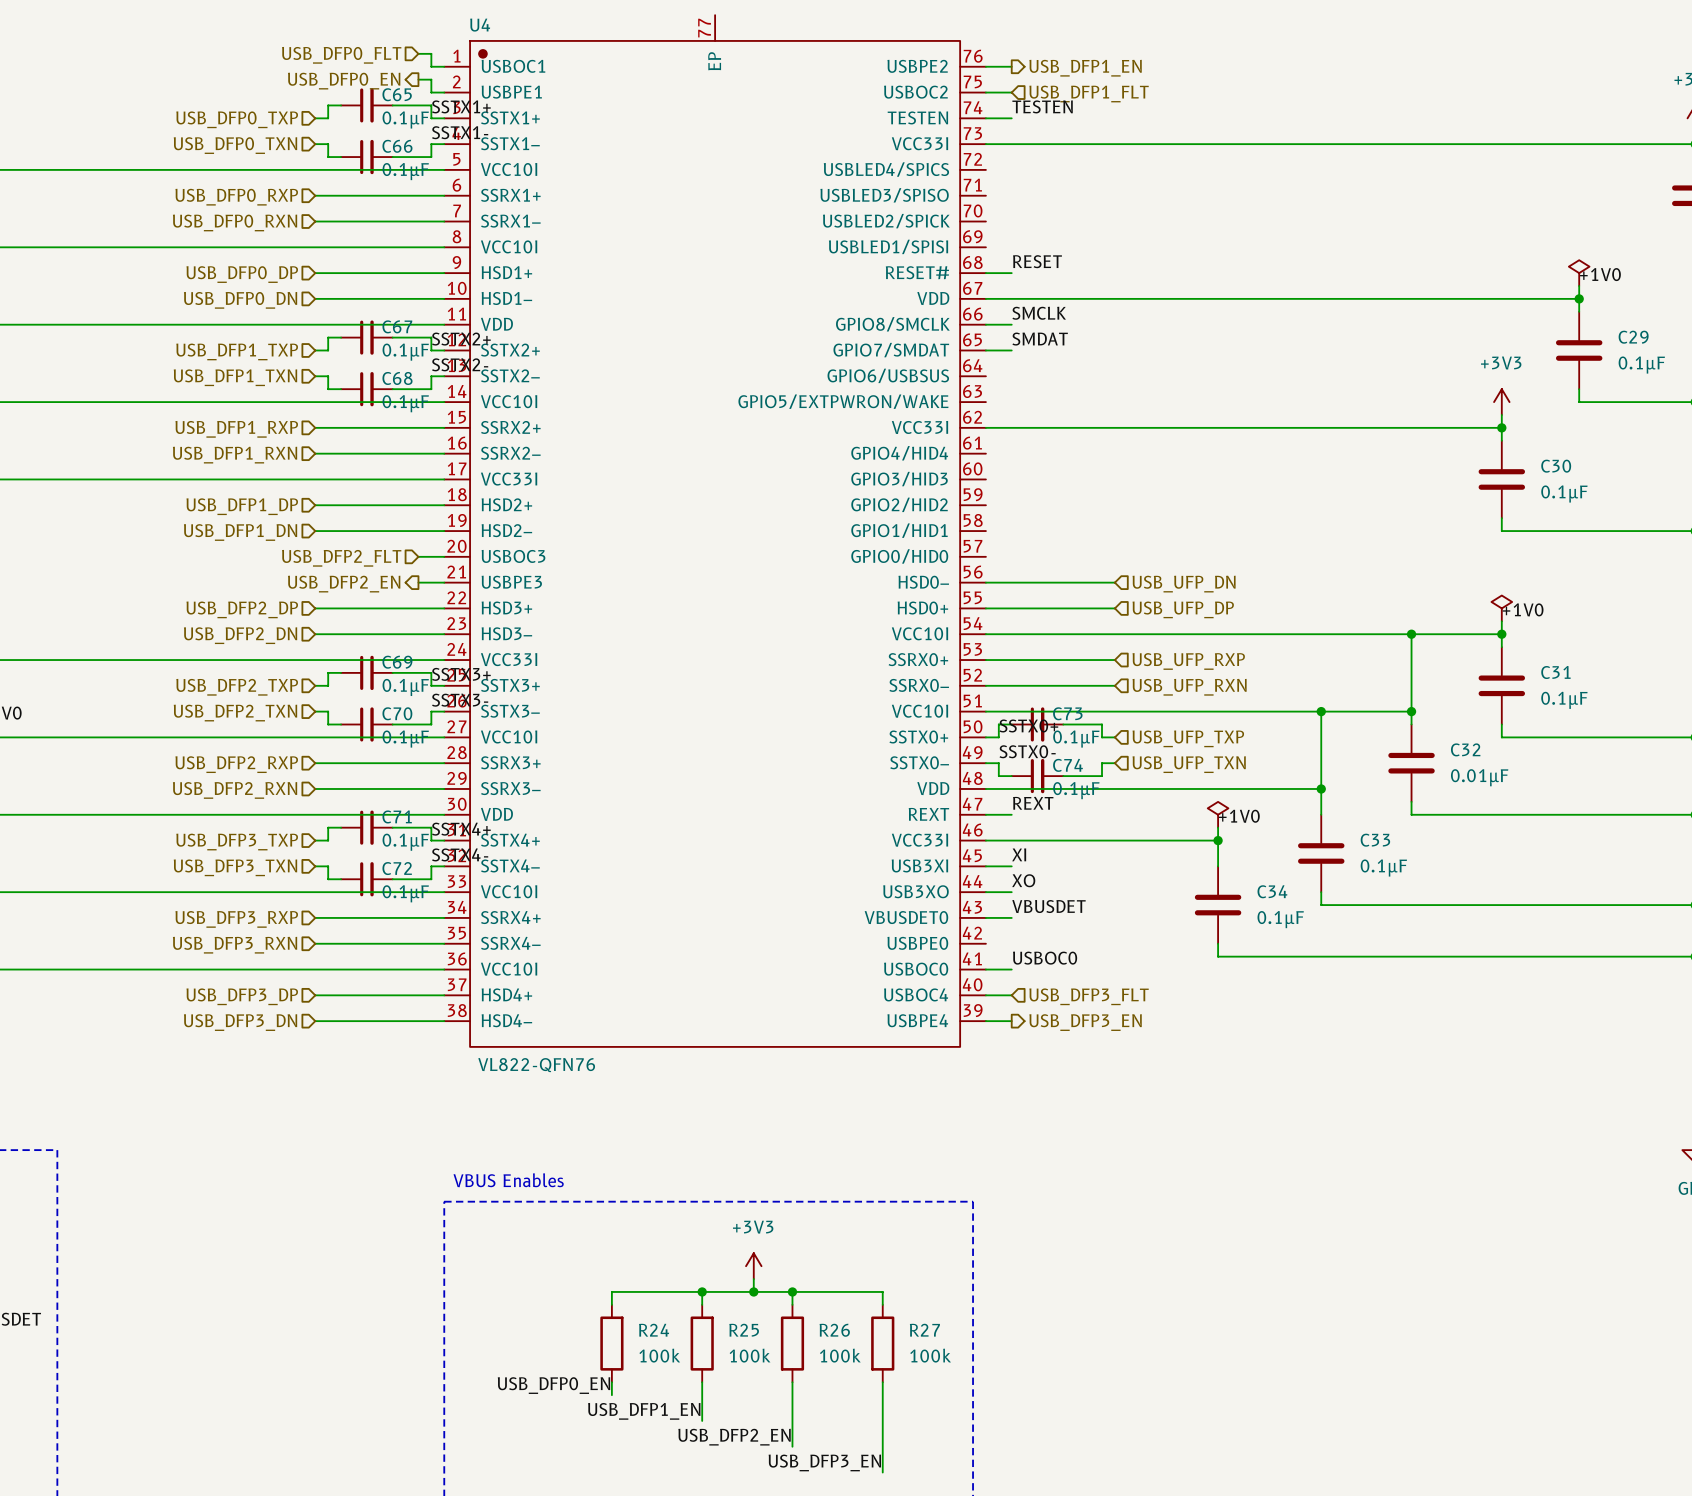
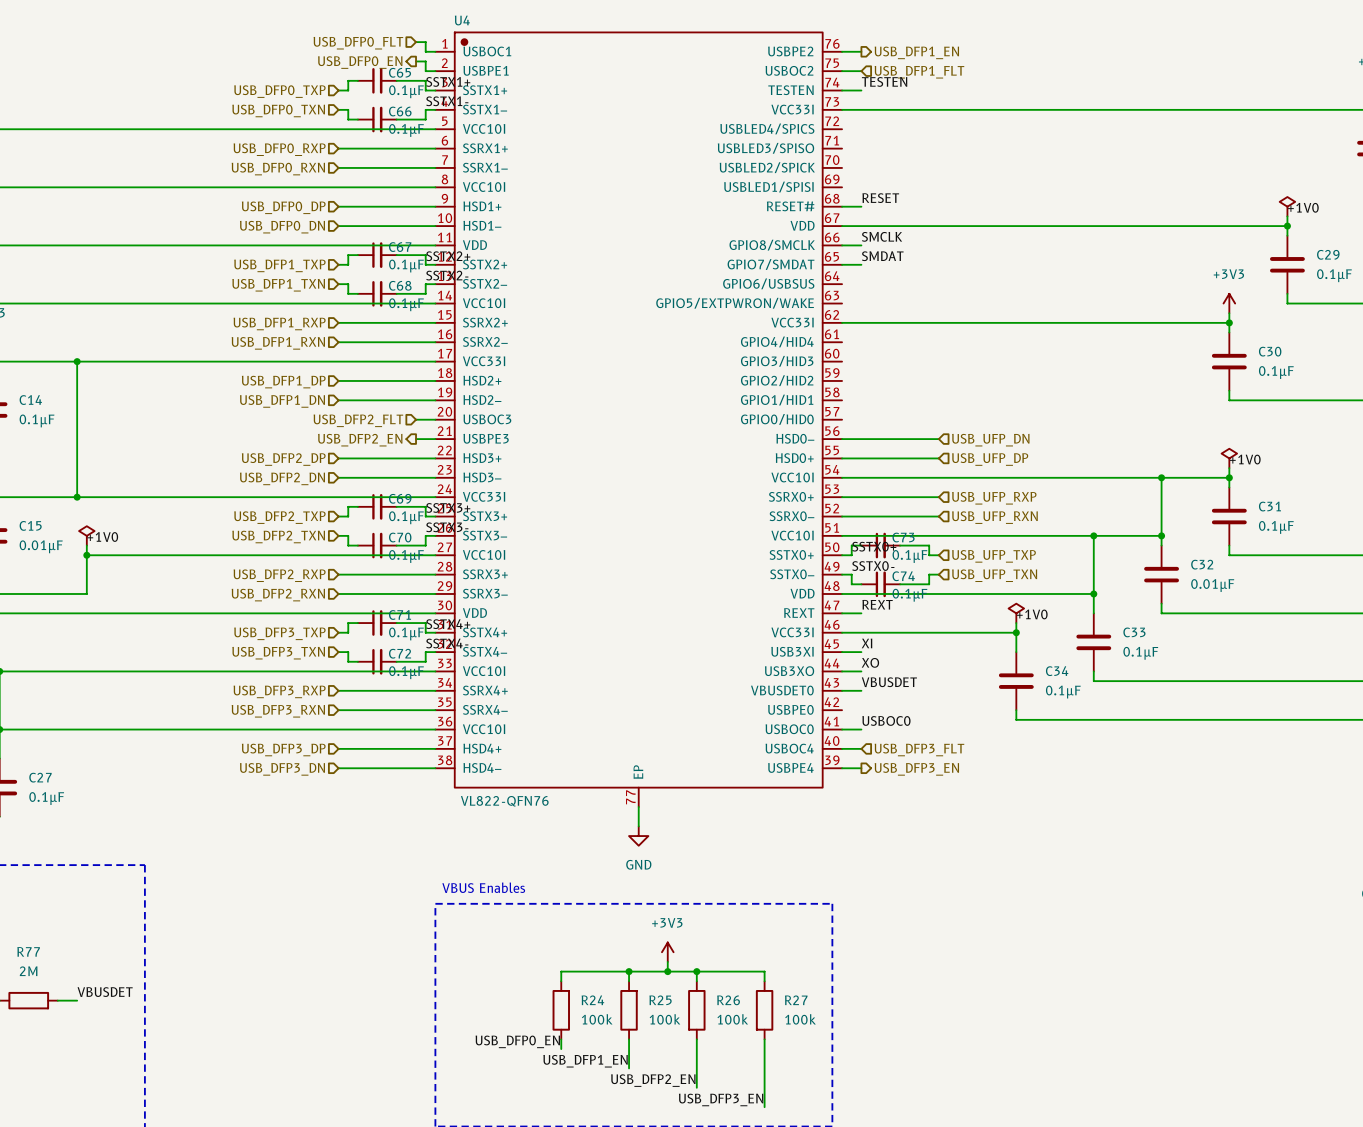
U4 symbol: [444, 15, 986, 1048] -> [435, 31, 843, 808]
wire: none -> (638, 807) (638, 826)
power symbol: none -> GND (638, 836)

